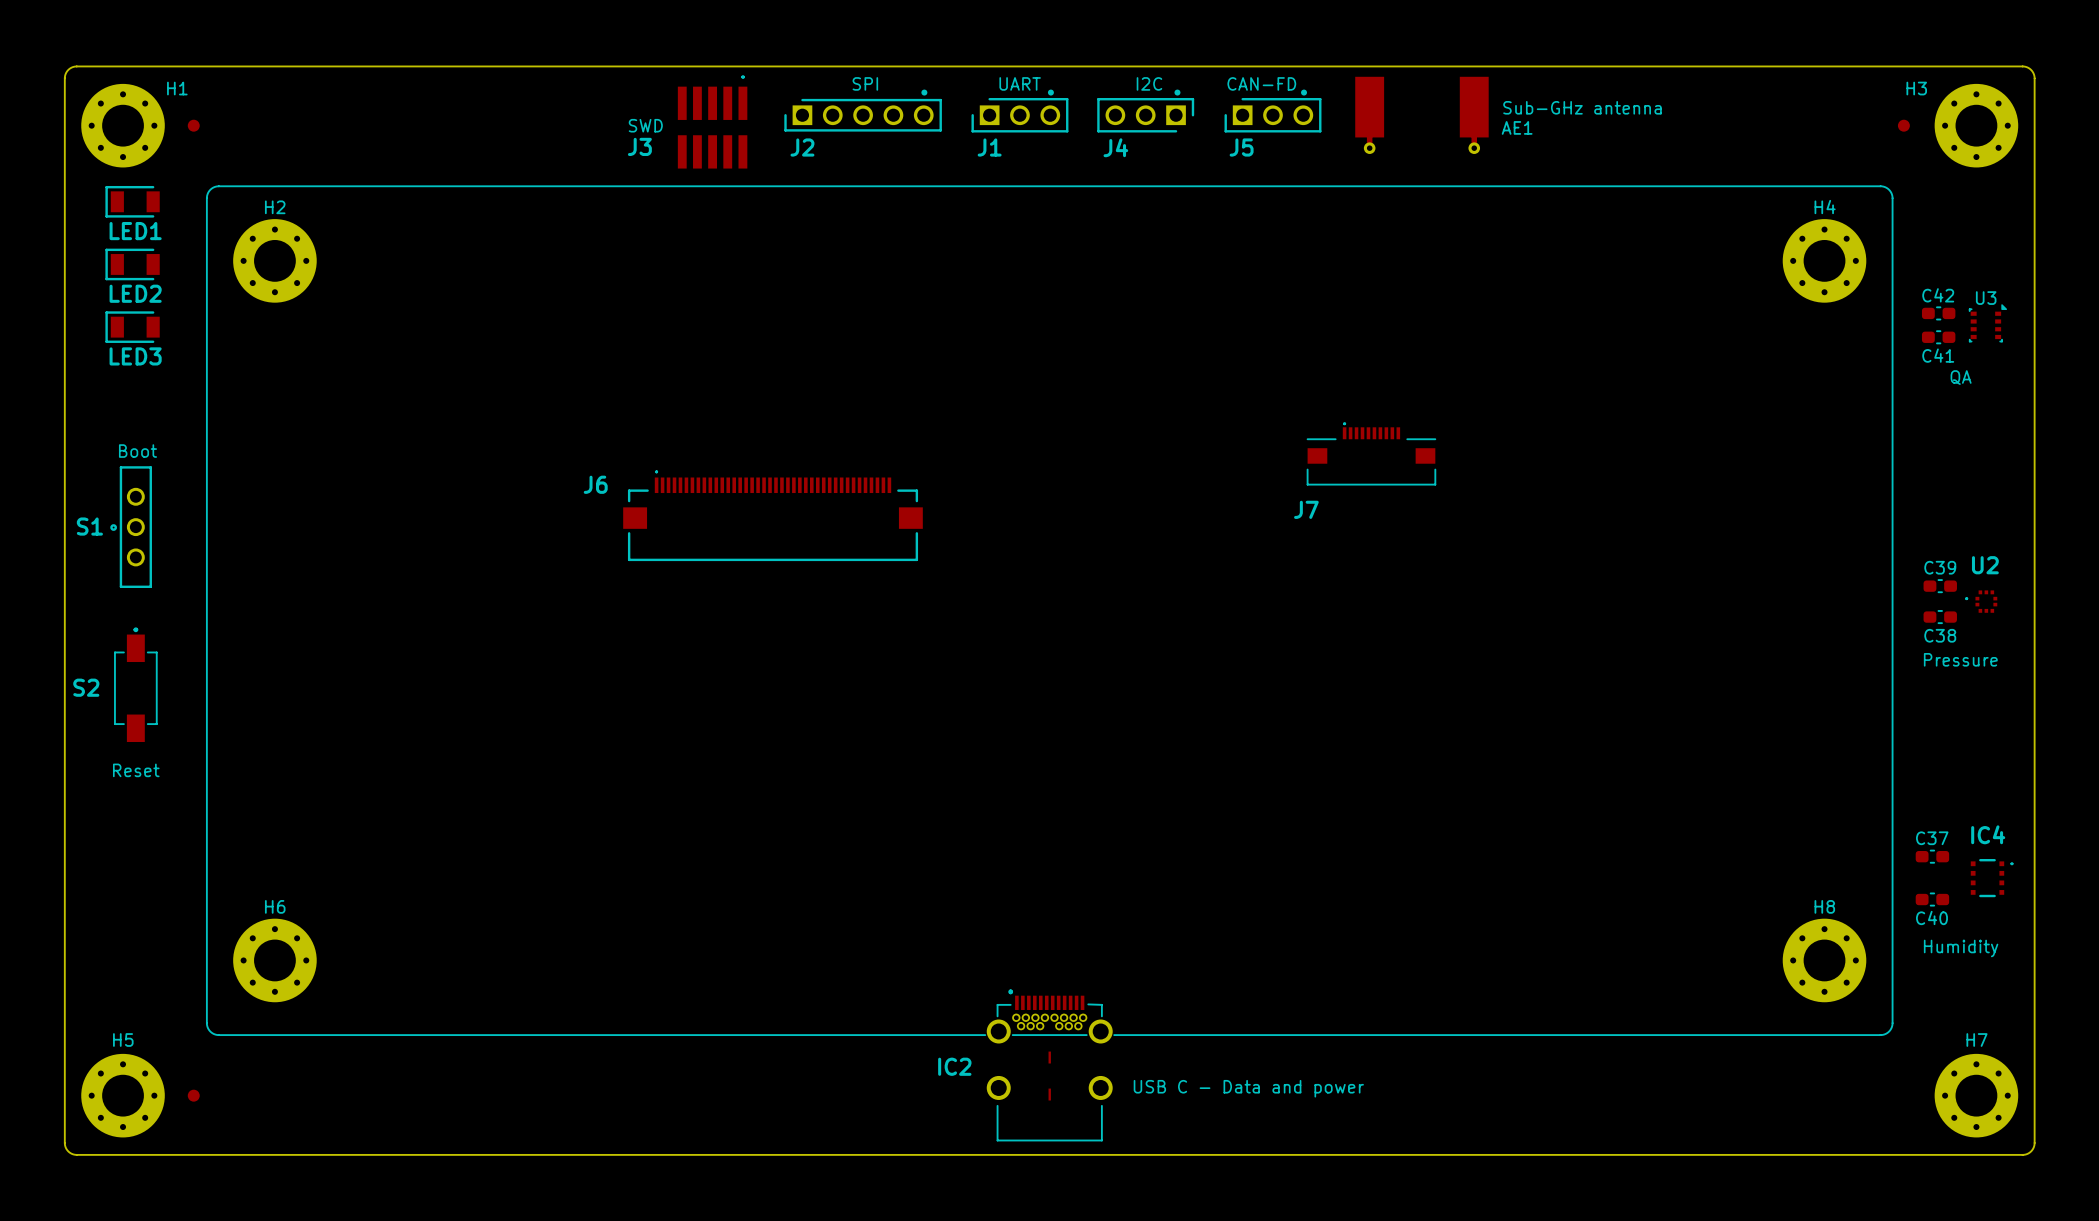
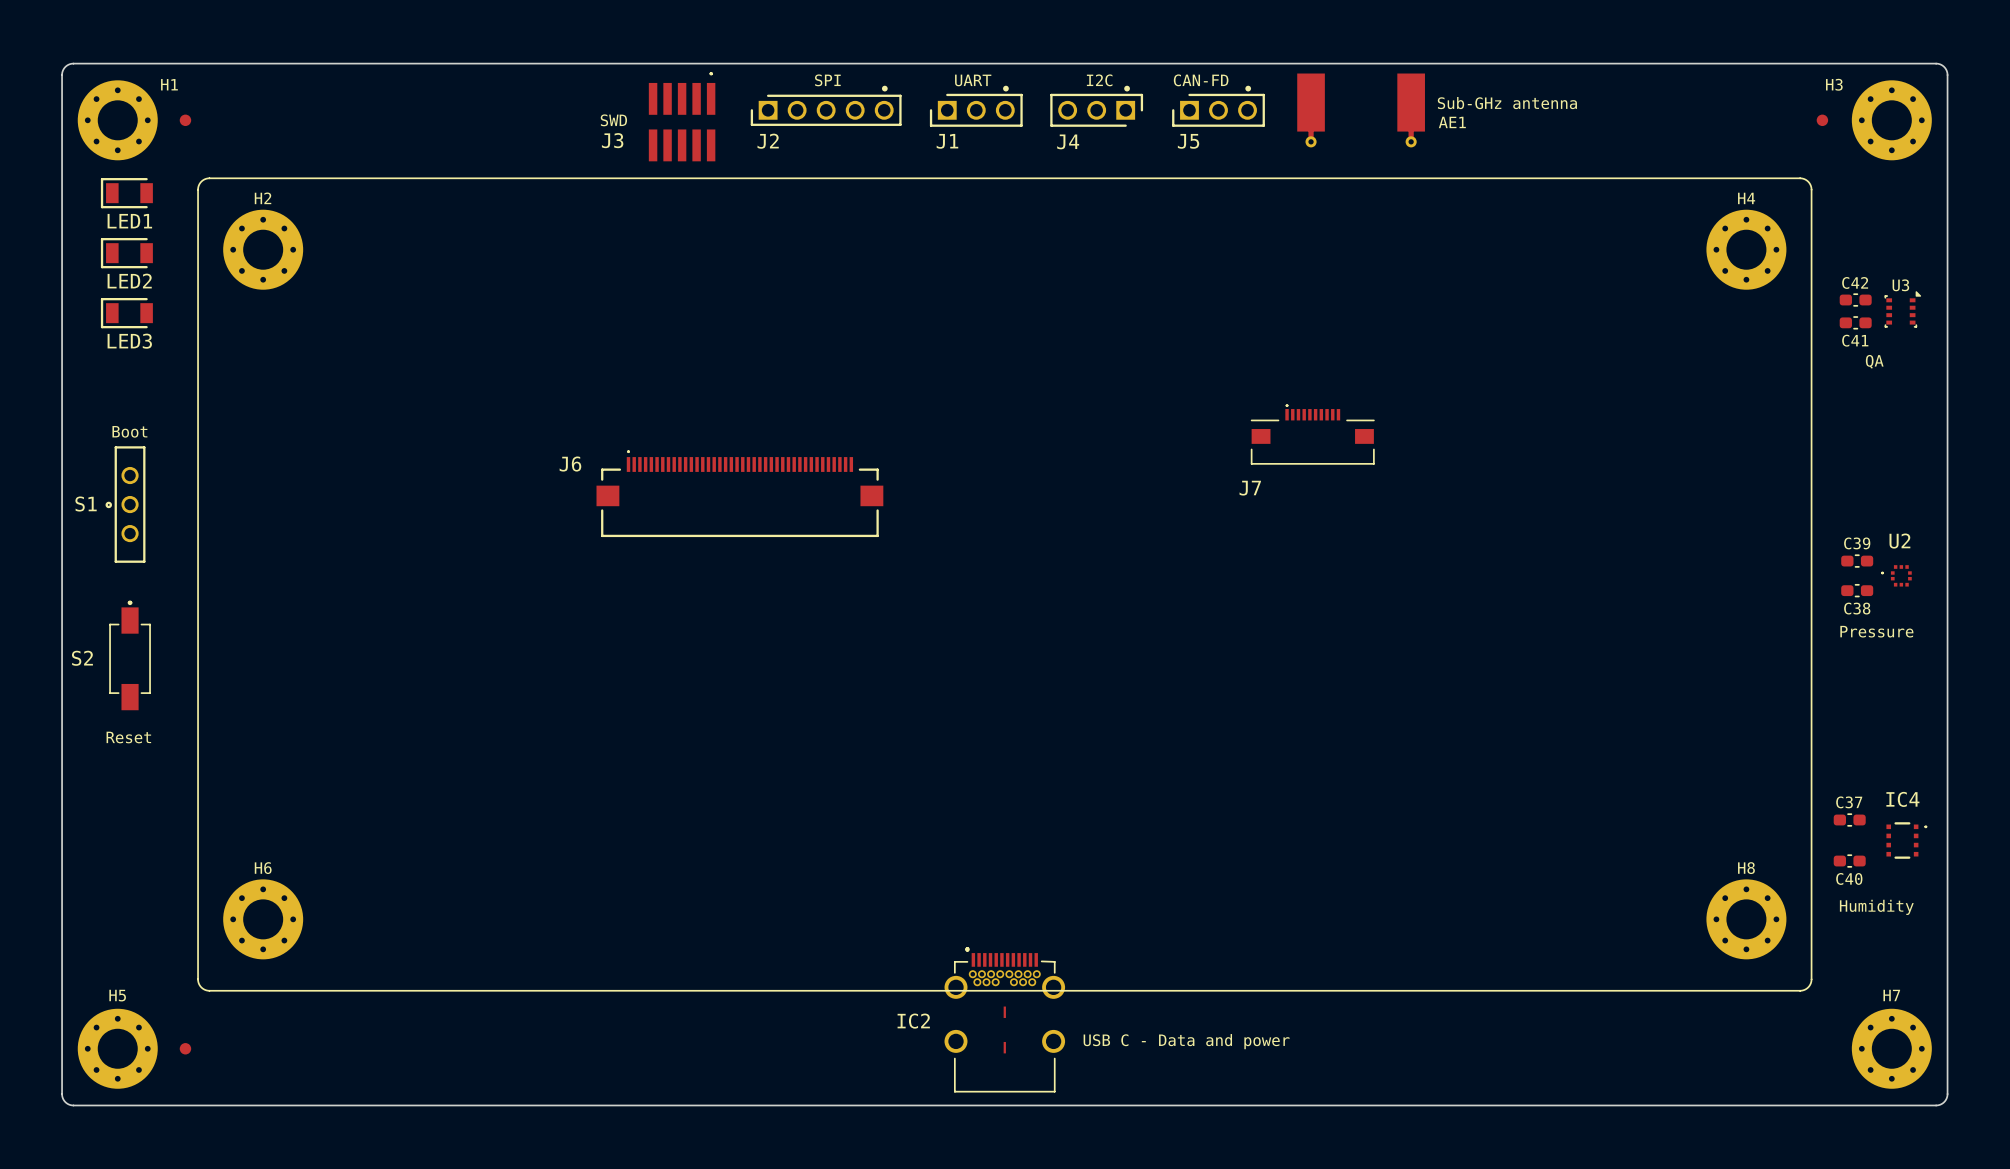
line: none -> (943, 990) (969, 990)
line: none -> (1040, 990) (1066, 990)

